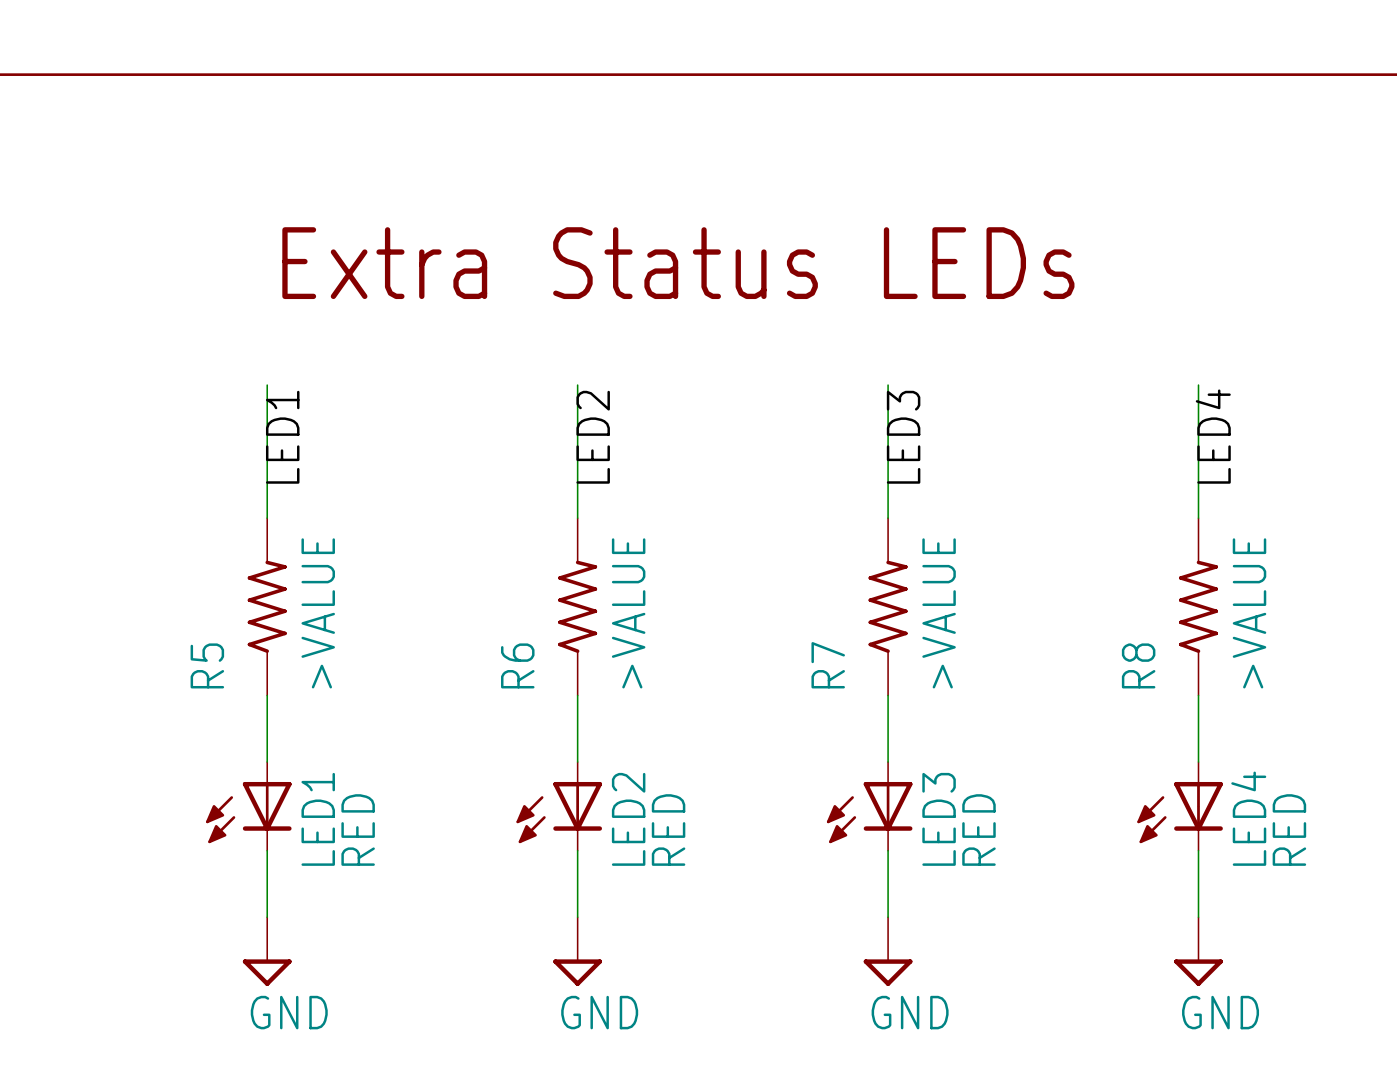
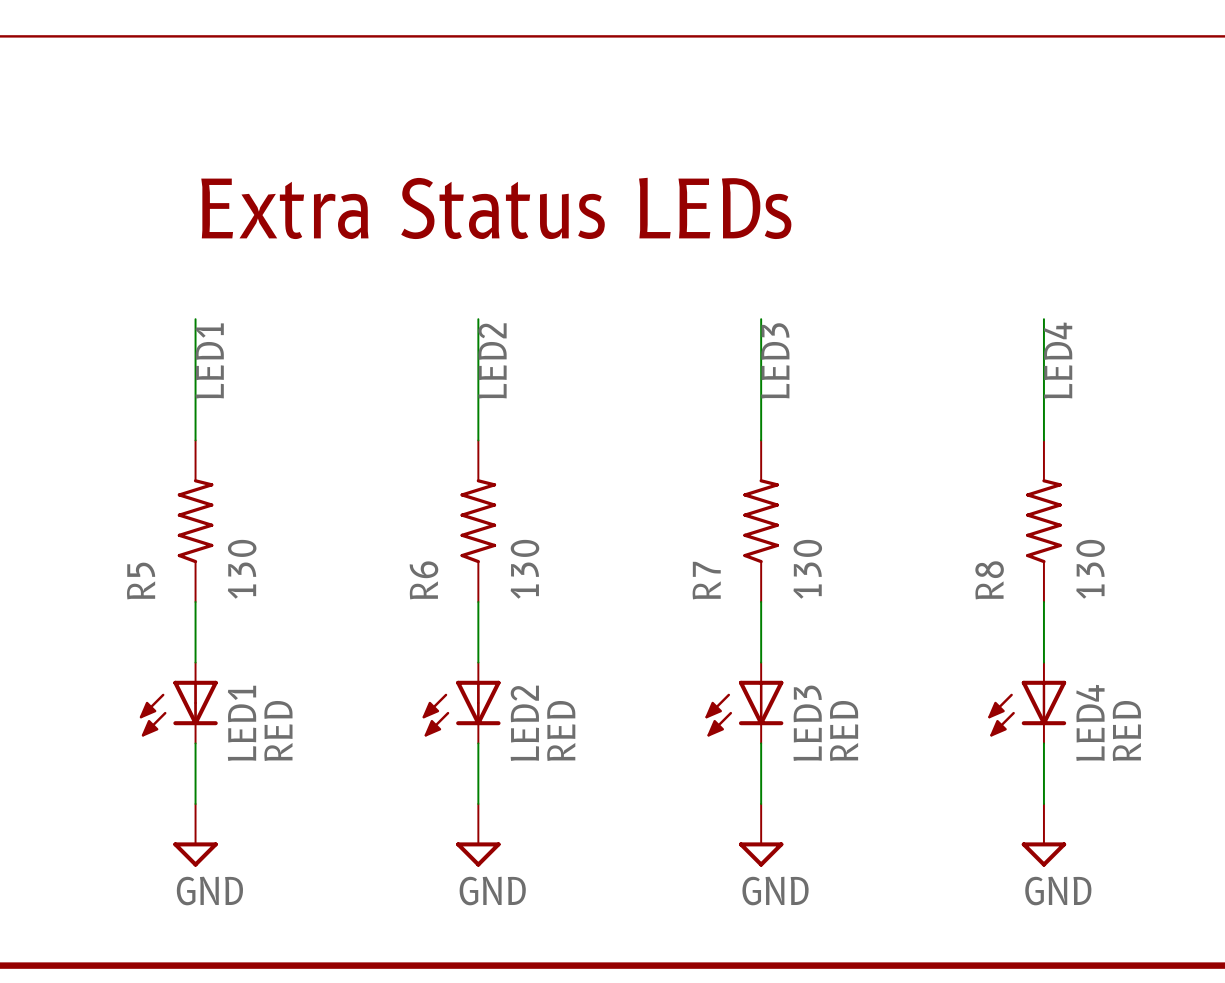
R5 value: >VALUE (318, 613) -> 130 (242, 569)
R6 value: >VALUE (628, 613) -> 130 (524, 569)
R7 value: >VALUE (939, 613) -> 130 (807, 569)
R8 value: >VALUE (1249, 613) -> 130 (1090, 569)

